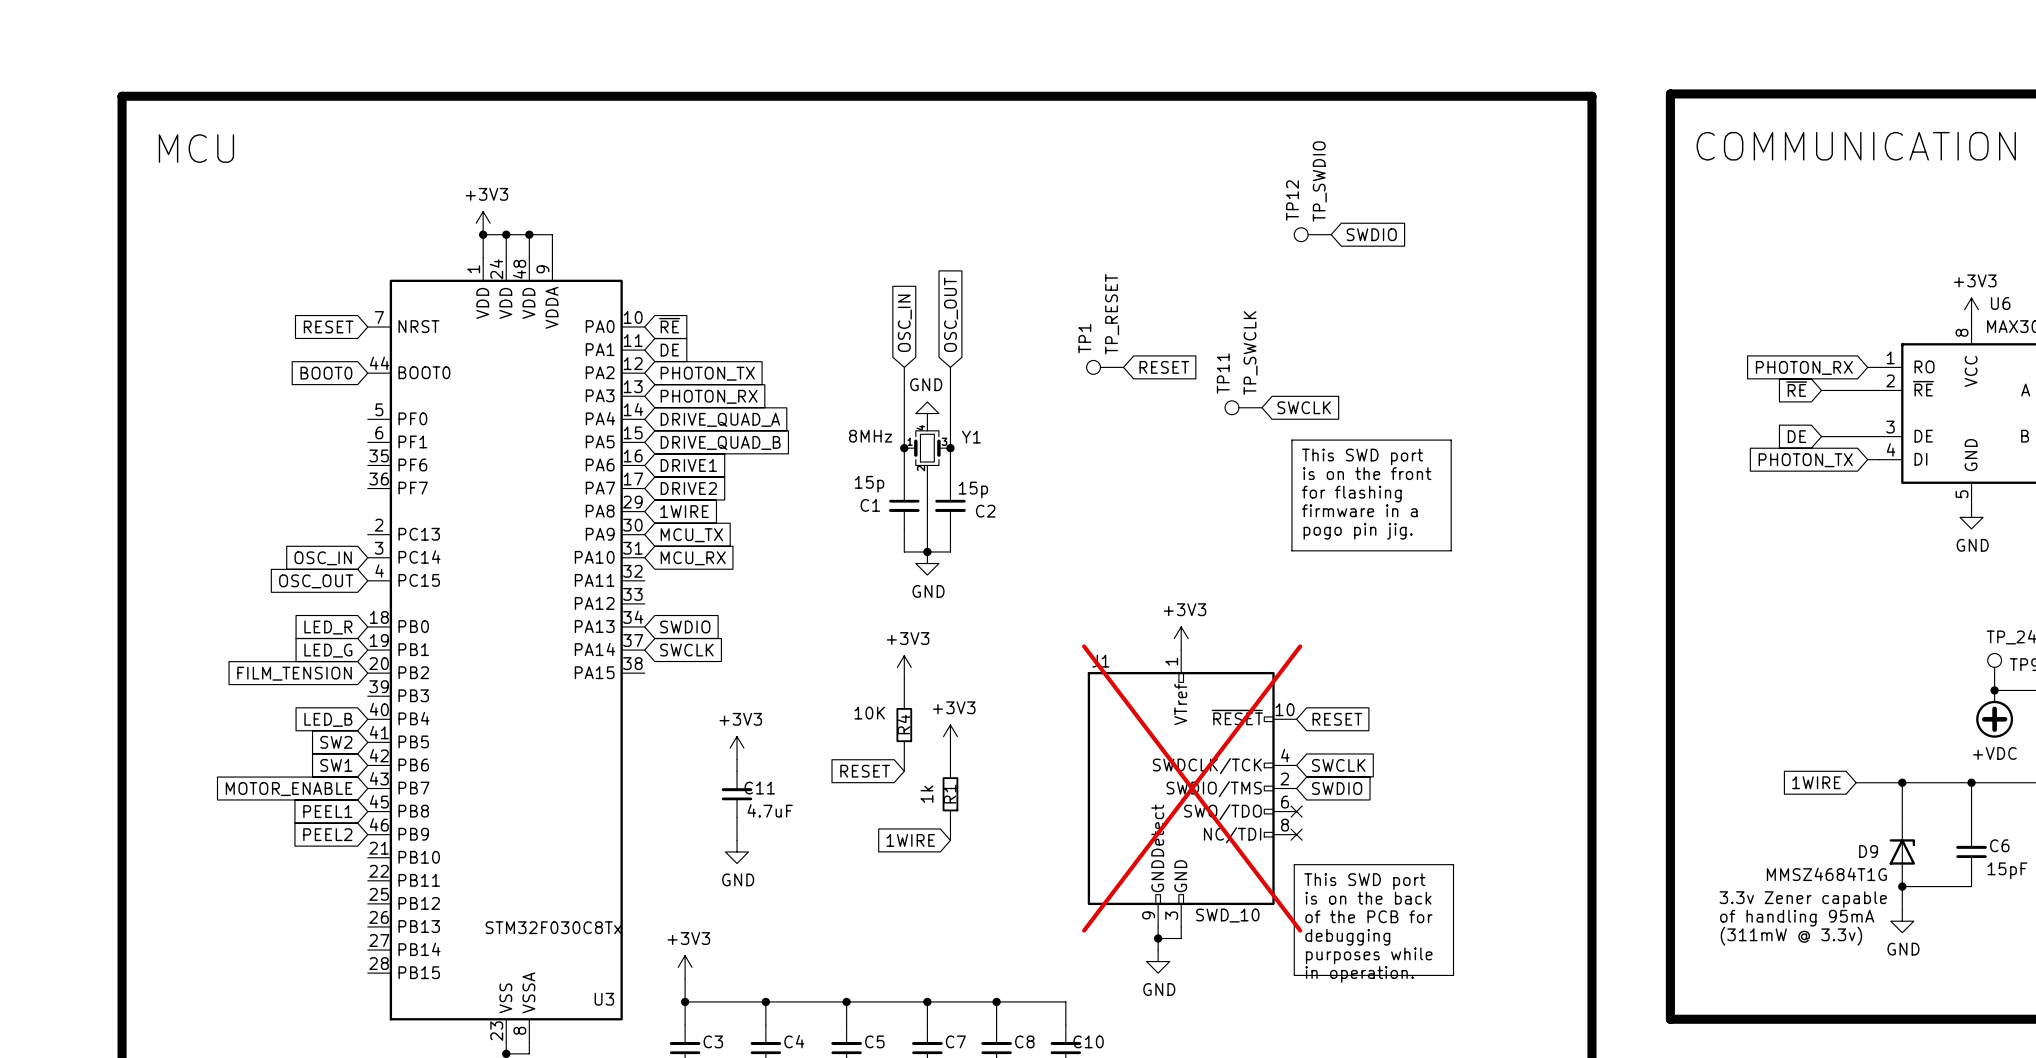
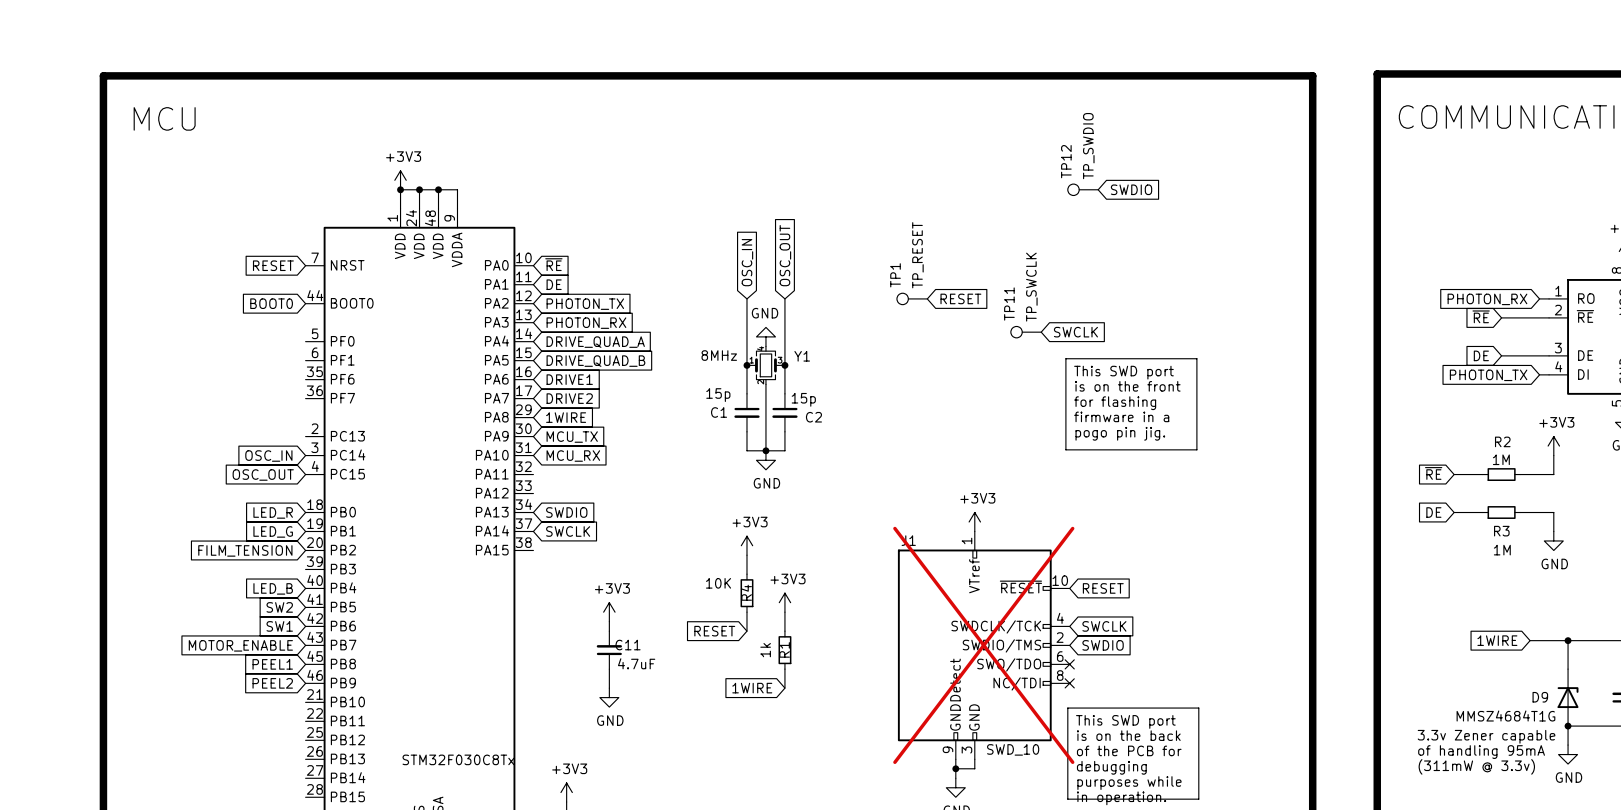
power symbol: none -> +3V3 (1553, 446)
wire: none -> (1553, 455) (1553, 474) (1520, 474)
global label: none -> ~{RE} (1433, 473)
wire: none -> (1454, 474) (1482, 474)
R2: none -> 1M (1501, 474)
global label: none -> DE (1433, 512)
wire: none -> (1454, 512) (1482, 512)
R3: none -> 1M (1501, 512)
wire: none -> (1520, 512) (1553, 512) (1553, 531)
power symbol: none -> GND (1553, 540)

